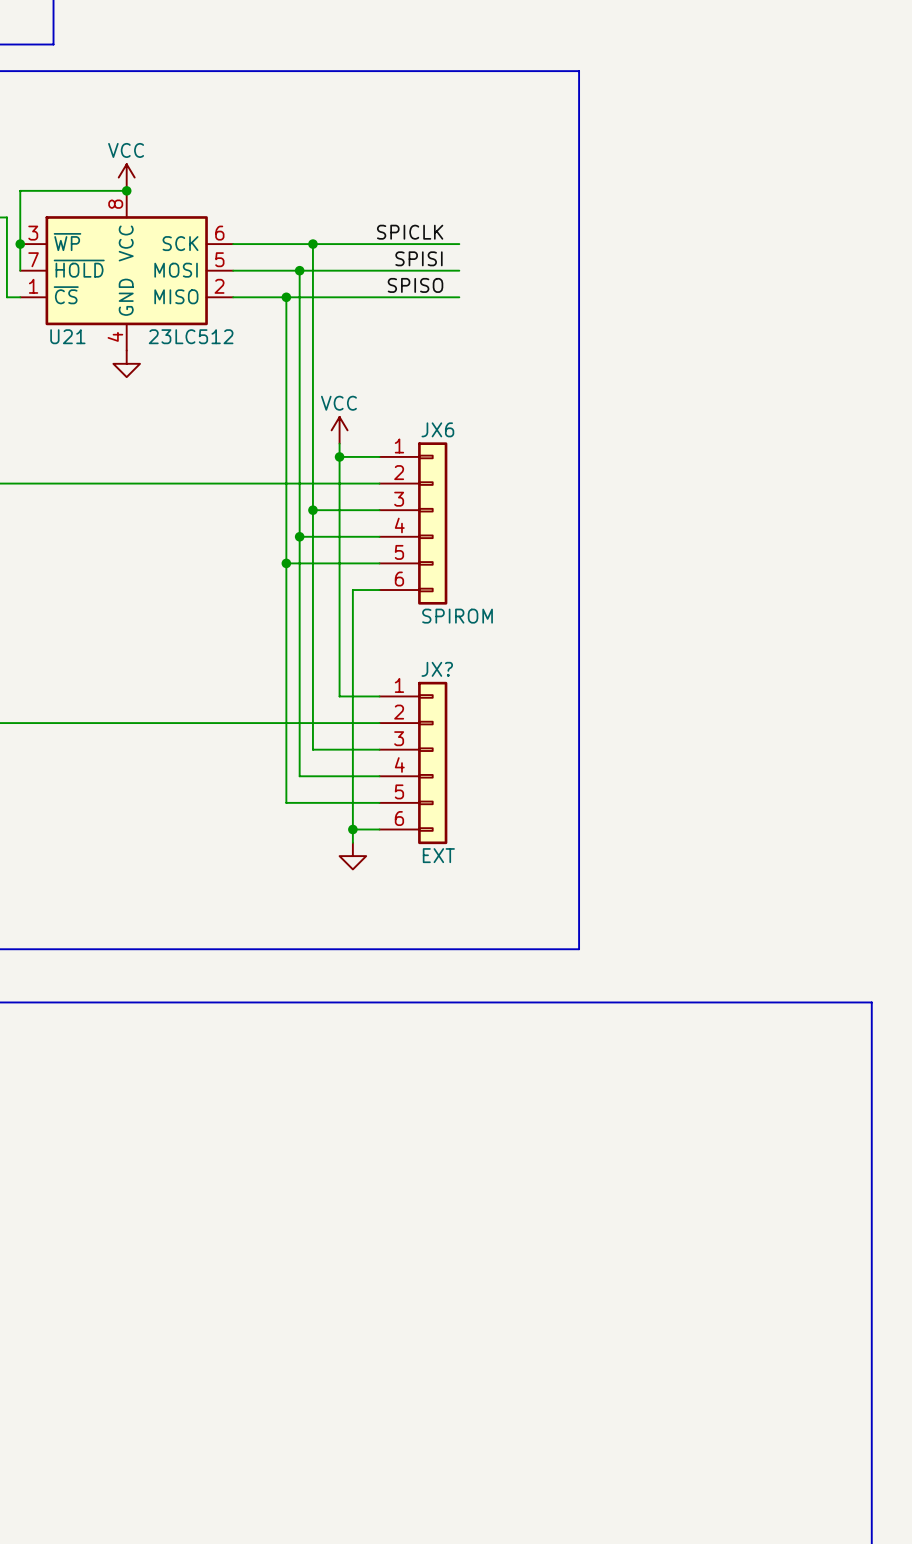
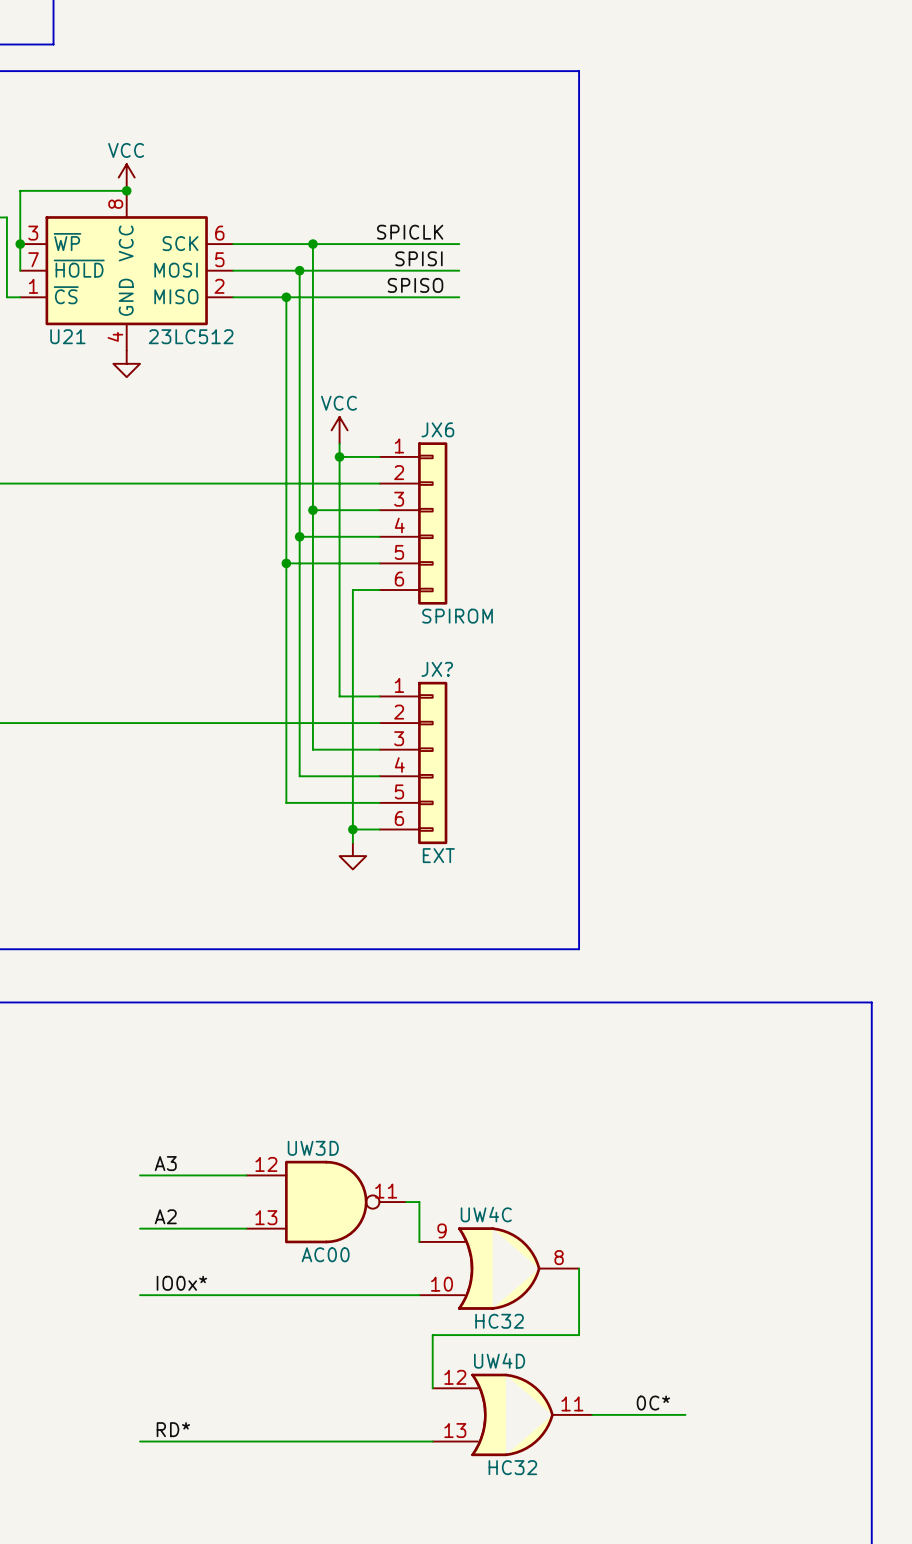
label: none -> A3 (165, 1163)
wire: none -> (140, 1175) (246, 1175)
UW3D: none -> AC00 (326, 1202)
wire: none -> (406, 1202) (419, 1202) (419, 1241)
label: none -> A2 (165, 1216)
wire: none -> (140, 1228) (246, 1228)
UW4C: none -> HC32 (499, 1268)
wire: none -> (579, 1268) (579, 1335) (432, 1335) (432, 1388)
label: none -> IO0x* (181, 1283)
wire: none -> (140, 1295) (419, 1295)
label: none -> 0C* (653, 1403)
UW4D: none -> HC32 (512, 1414)
wire: none -> (592, 1414) (685, 1414)
label: none -> RD* (173, 1429)
wire: none -> (140, 1441) (432, 1441)

